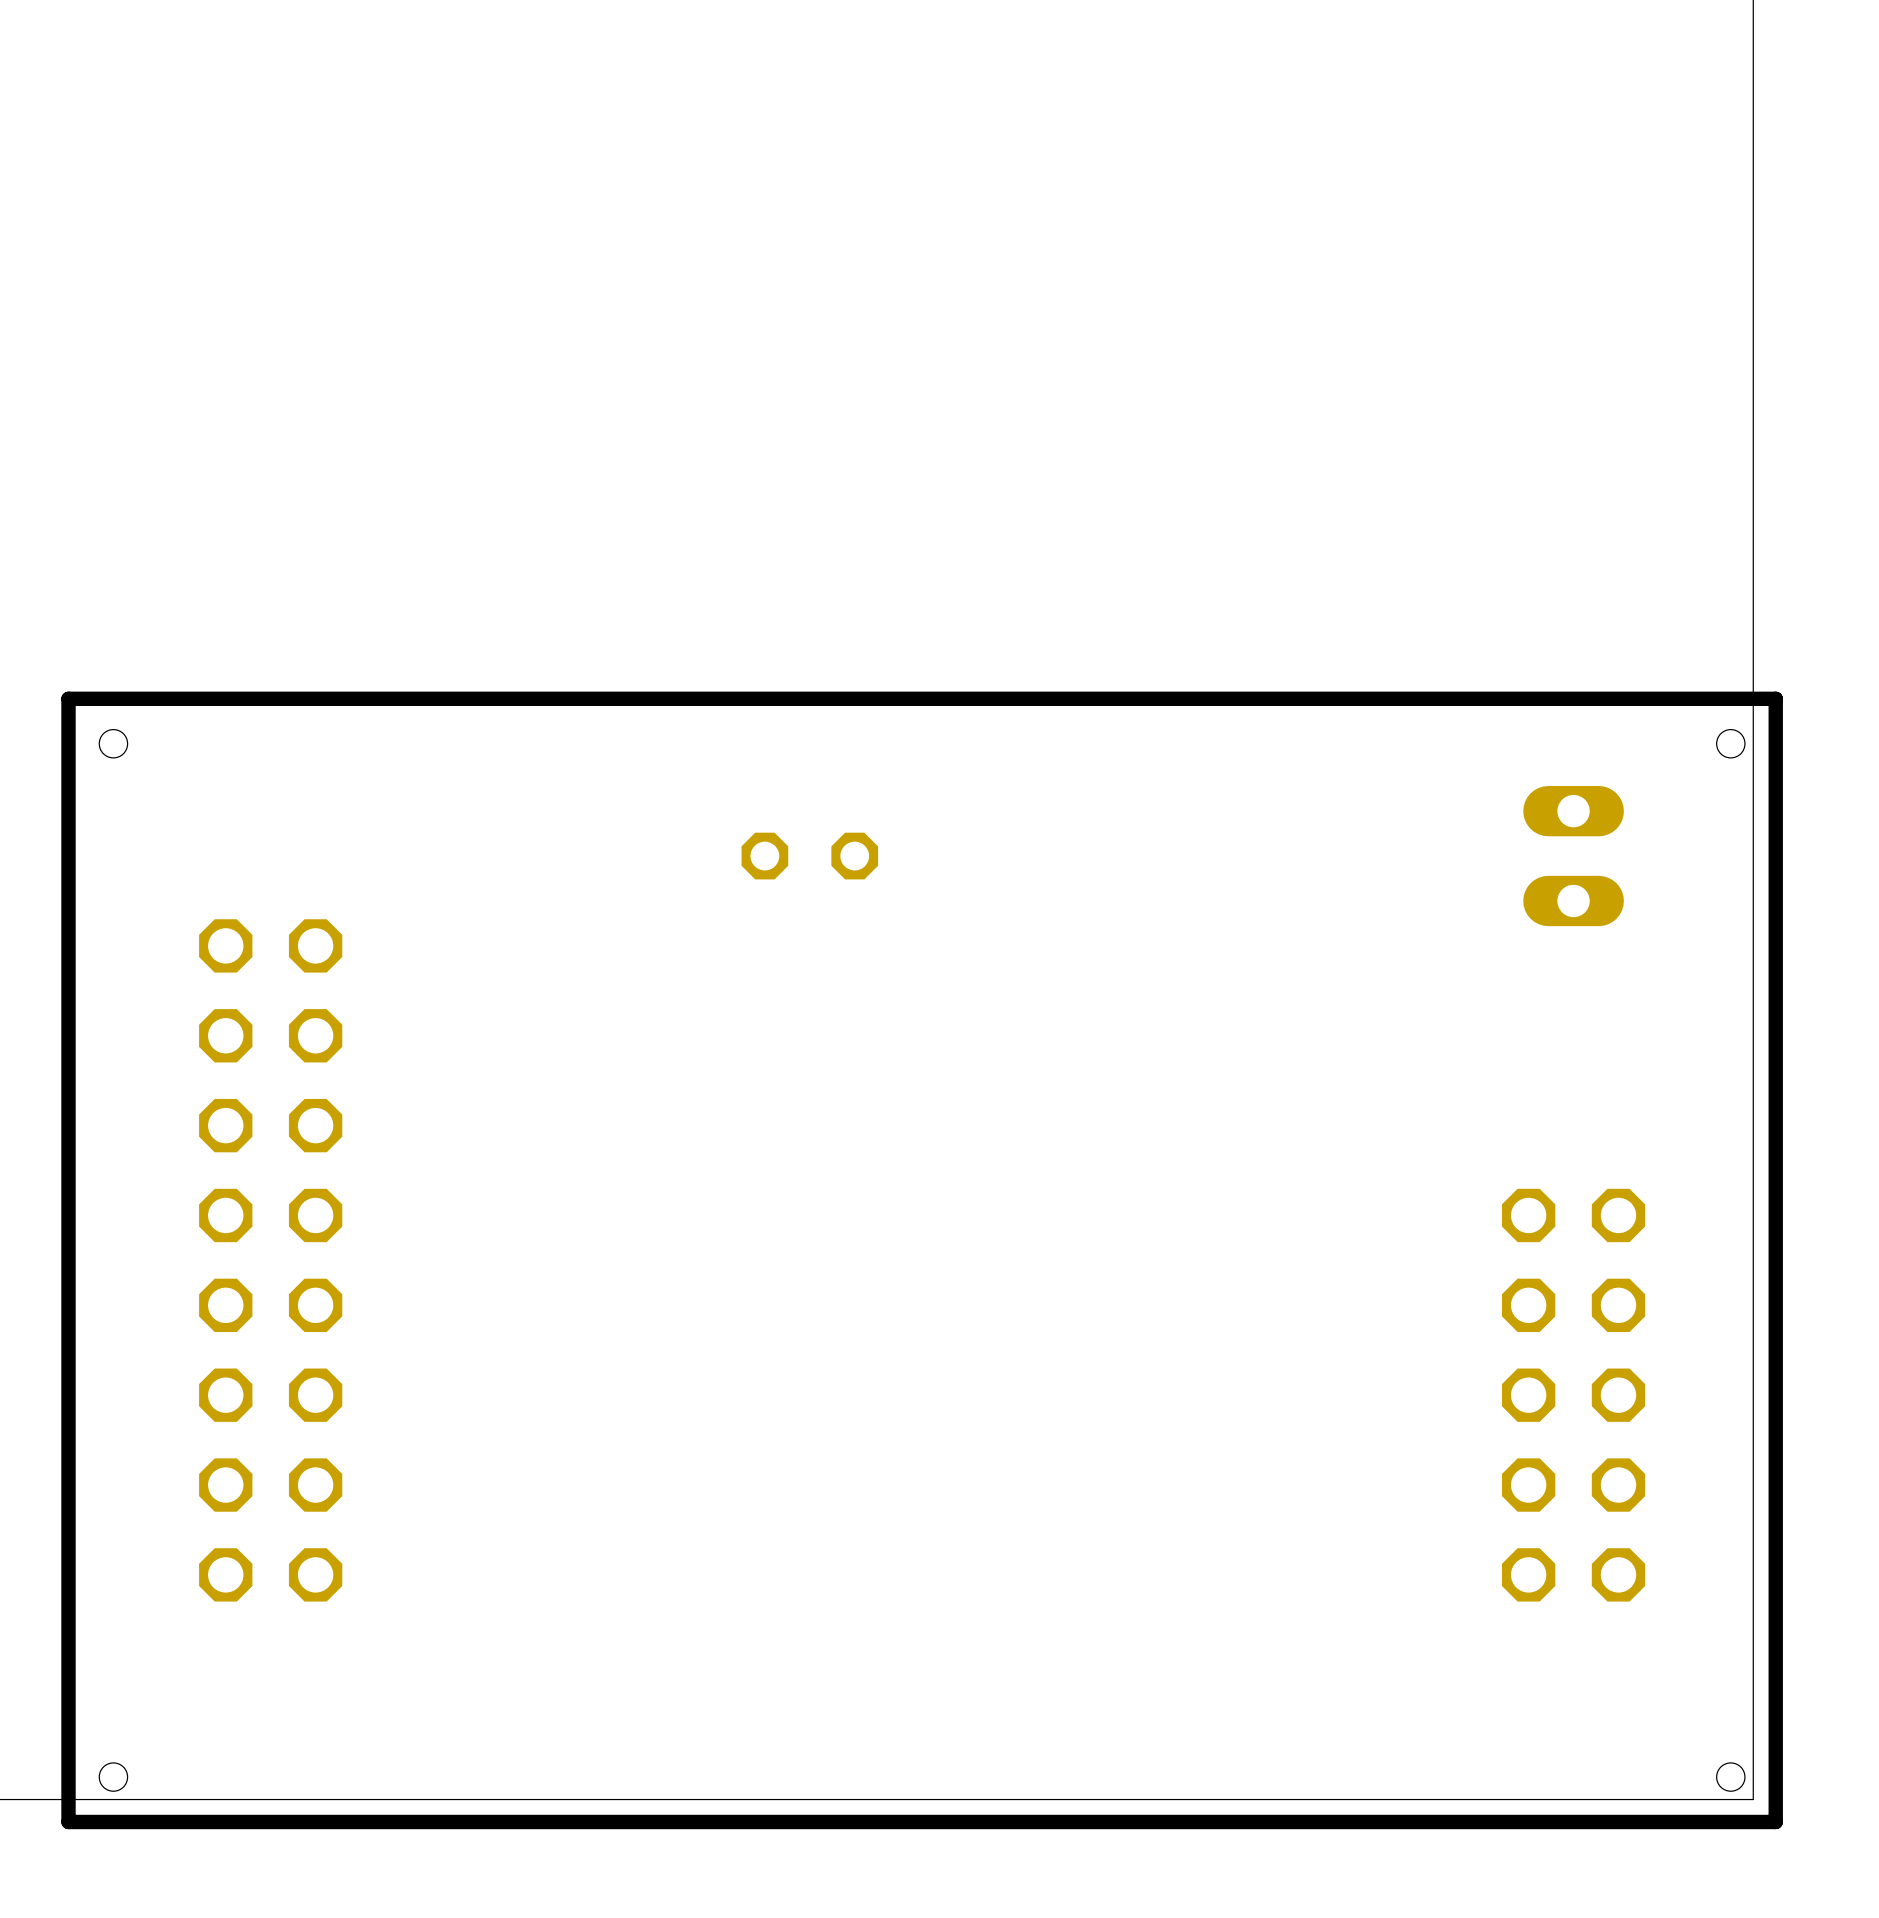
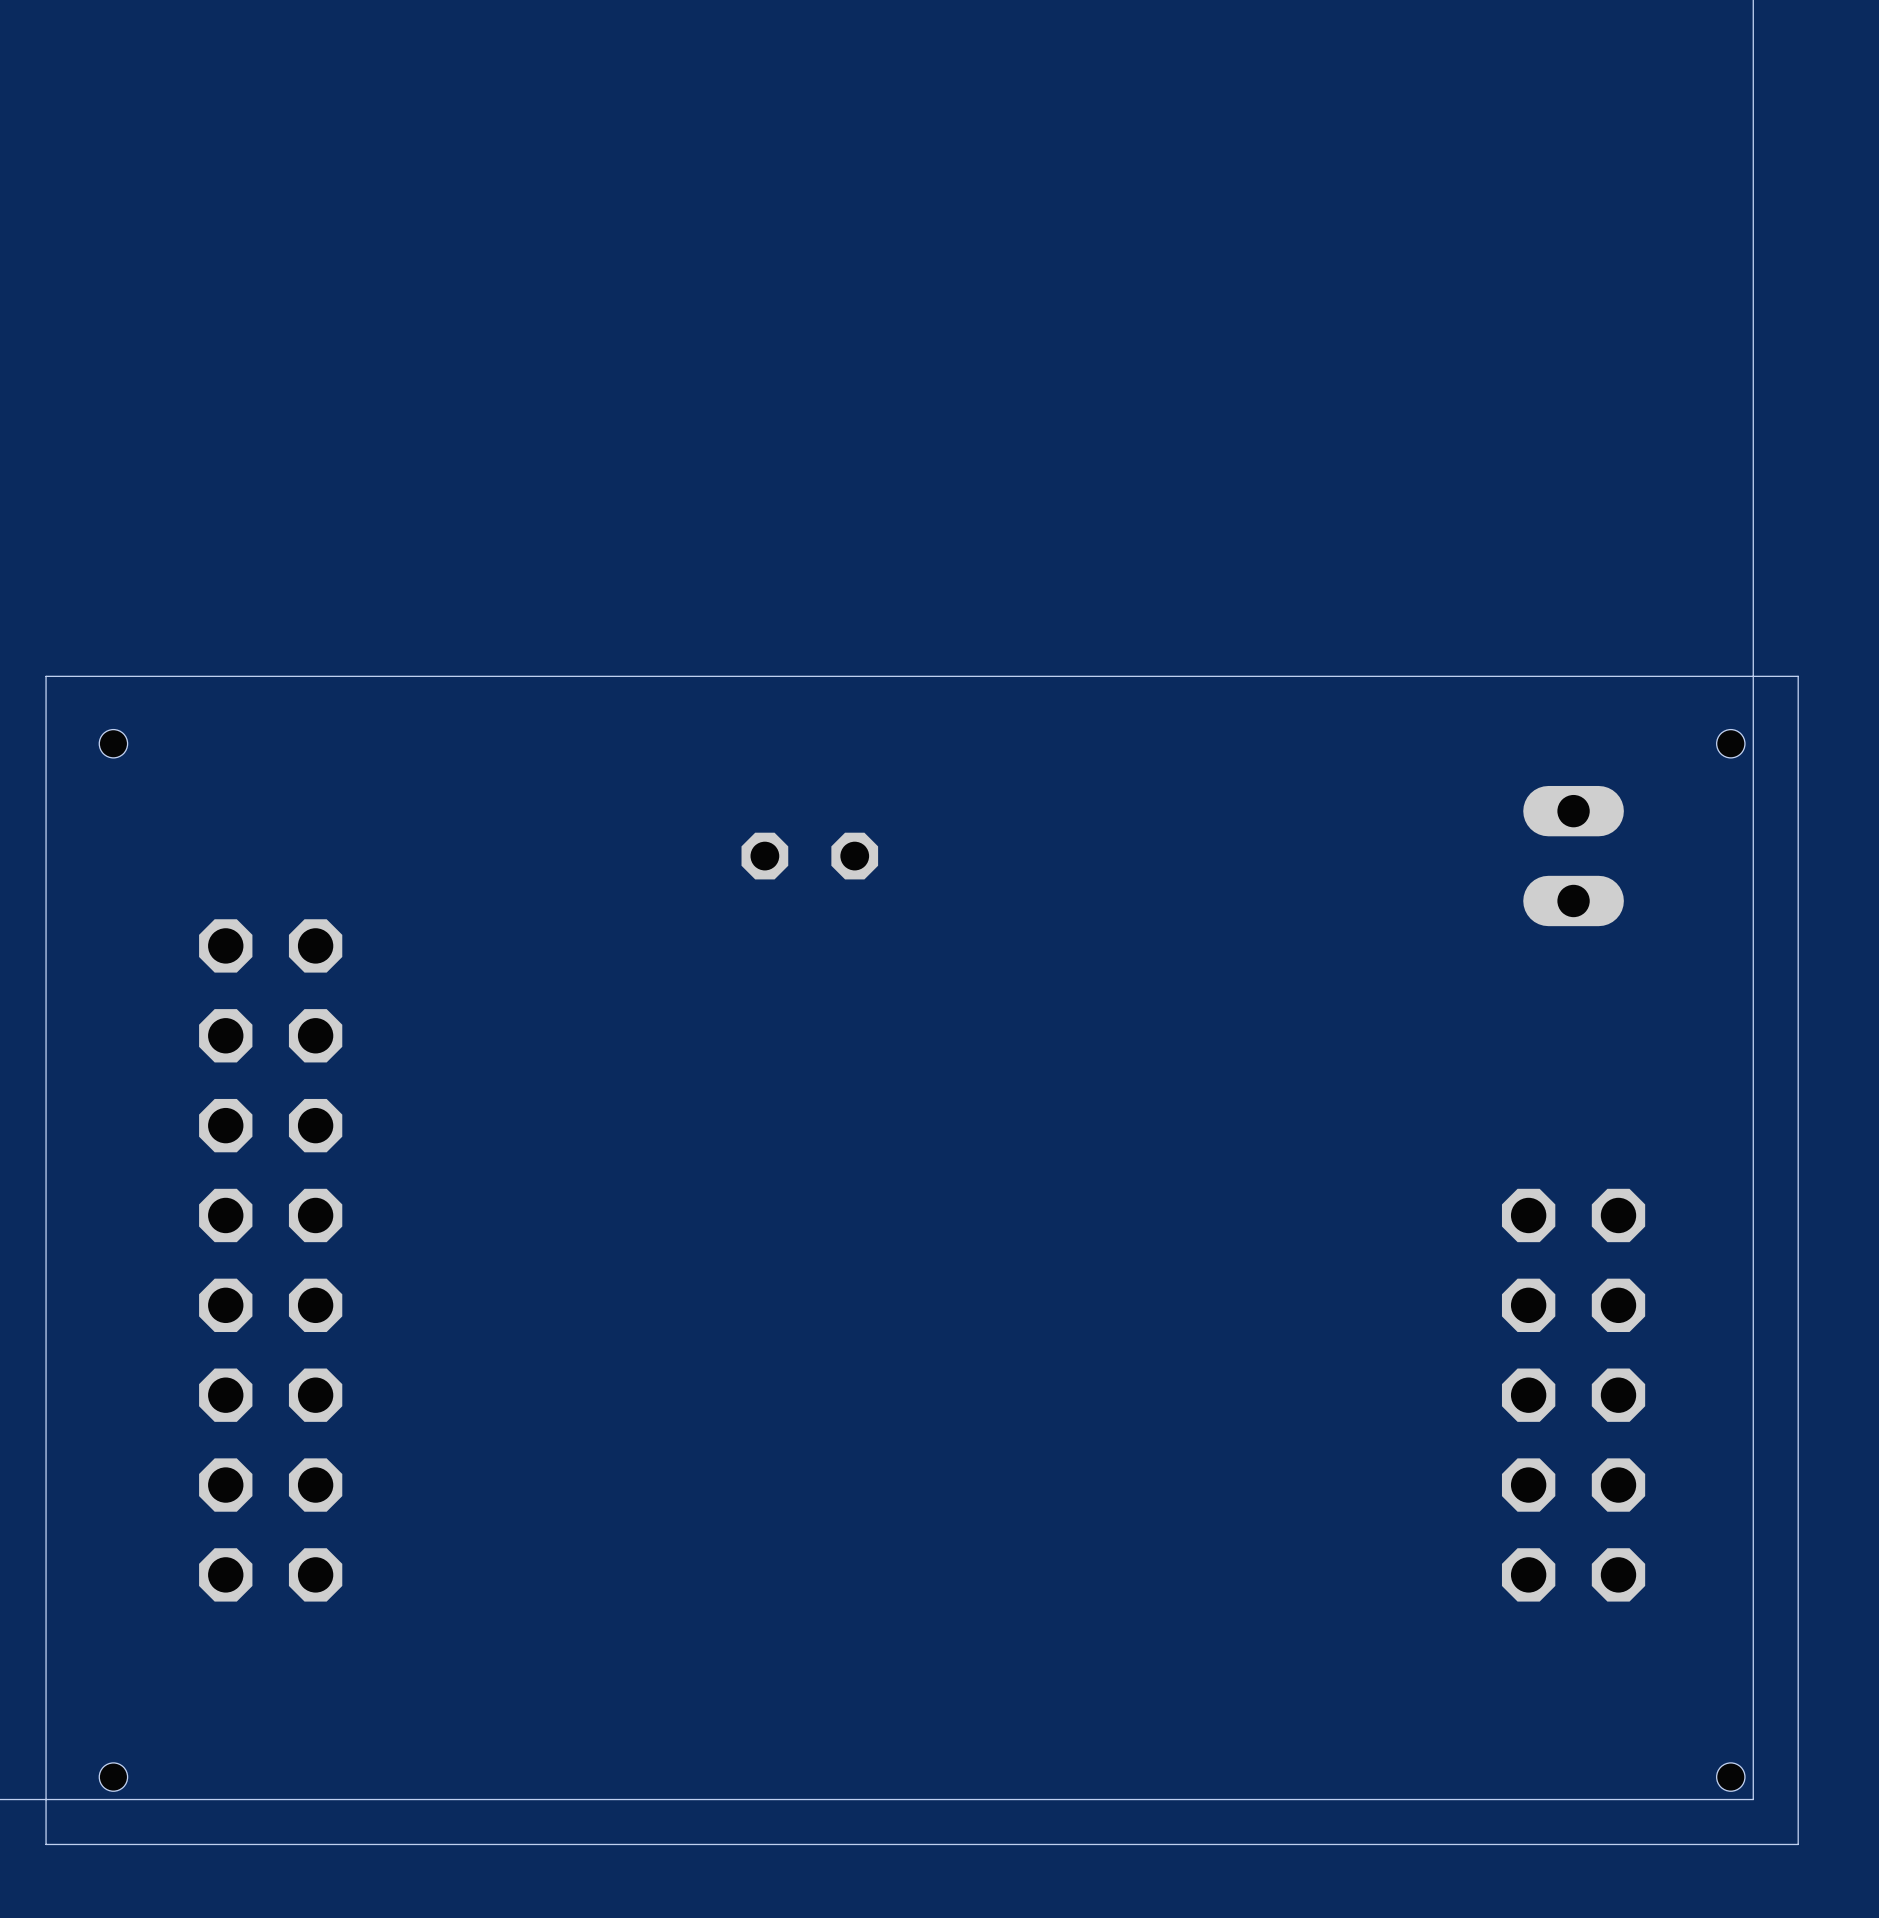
board edge: (1775, 698) (1775, 1821) (68, 1821) (68, 698) (1775, 698) -> (1798, 676) (1798, 1844) (46, 1844) (46, 676) (1798, 676)

